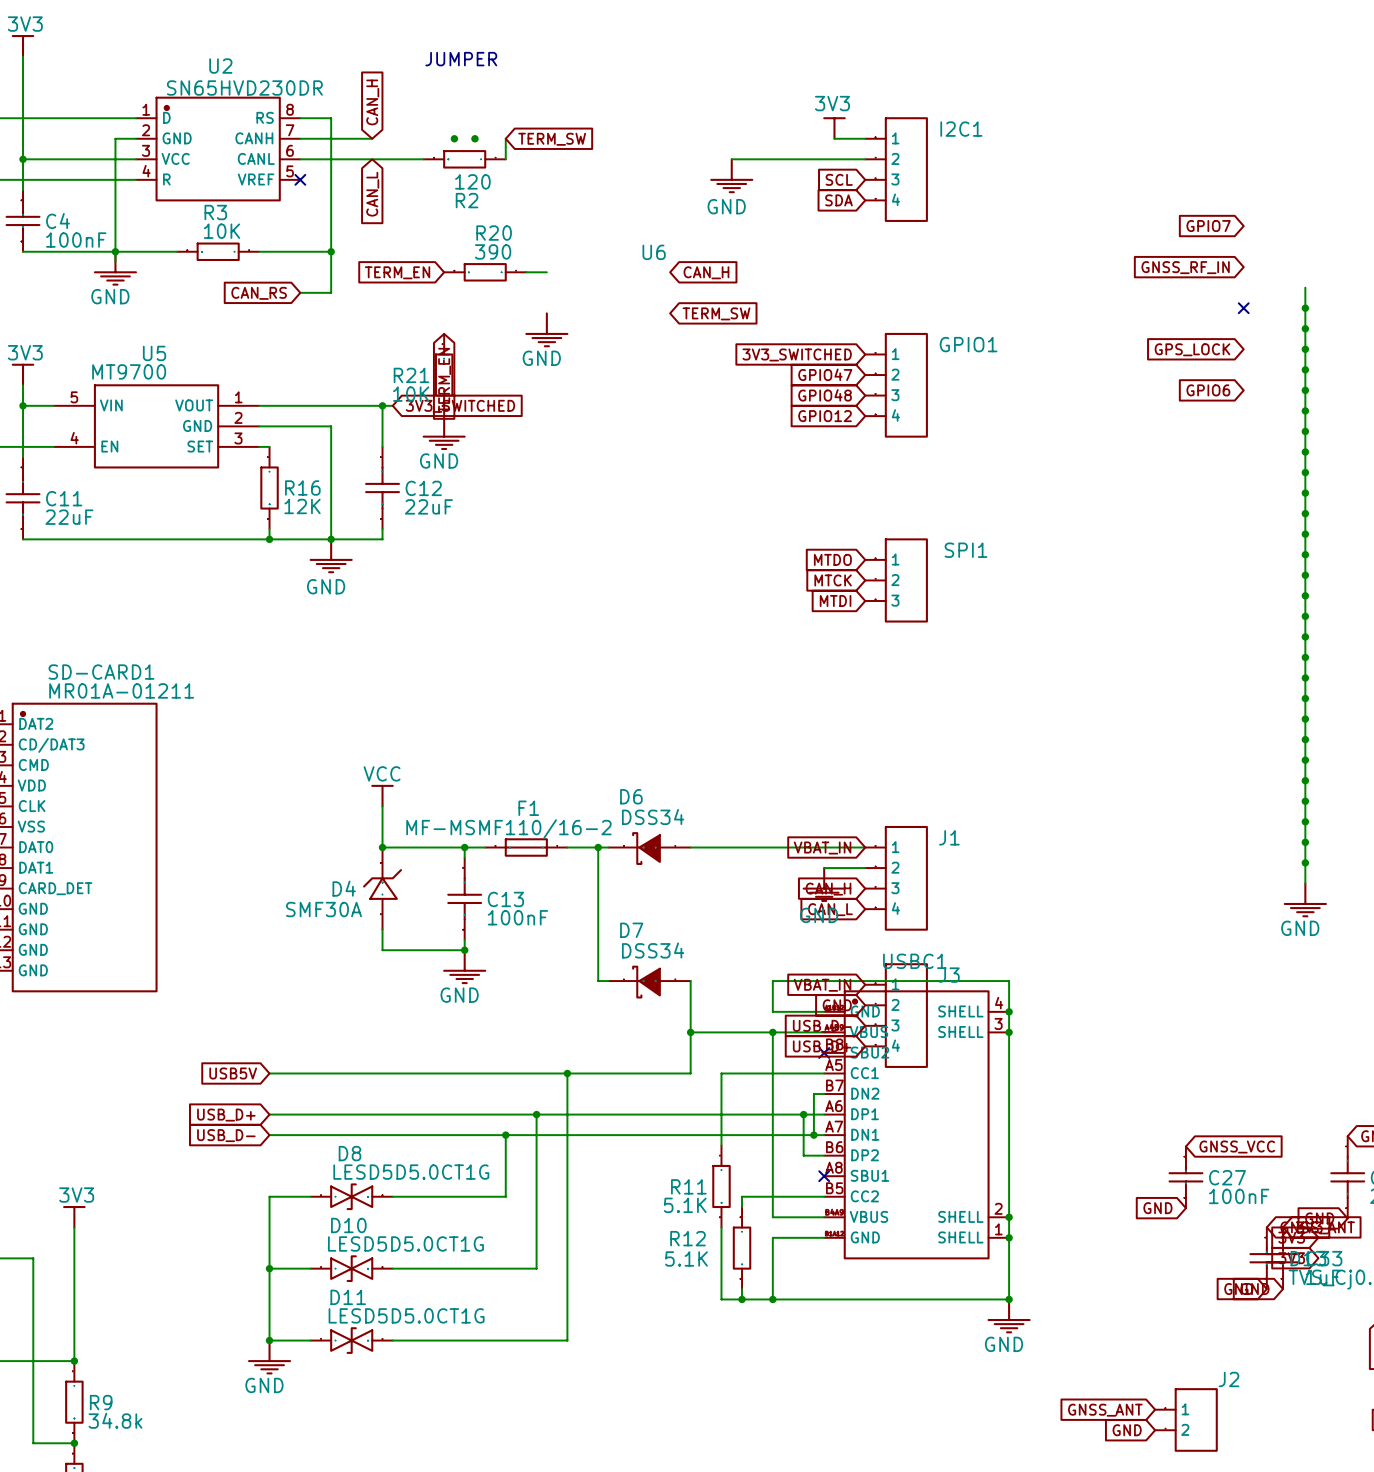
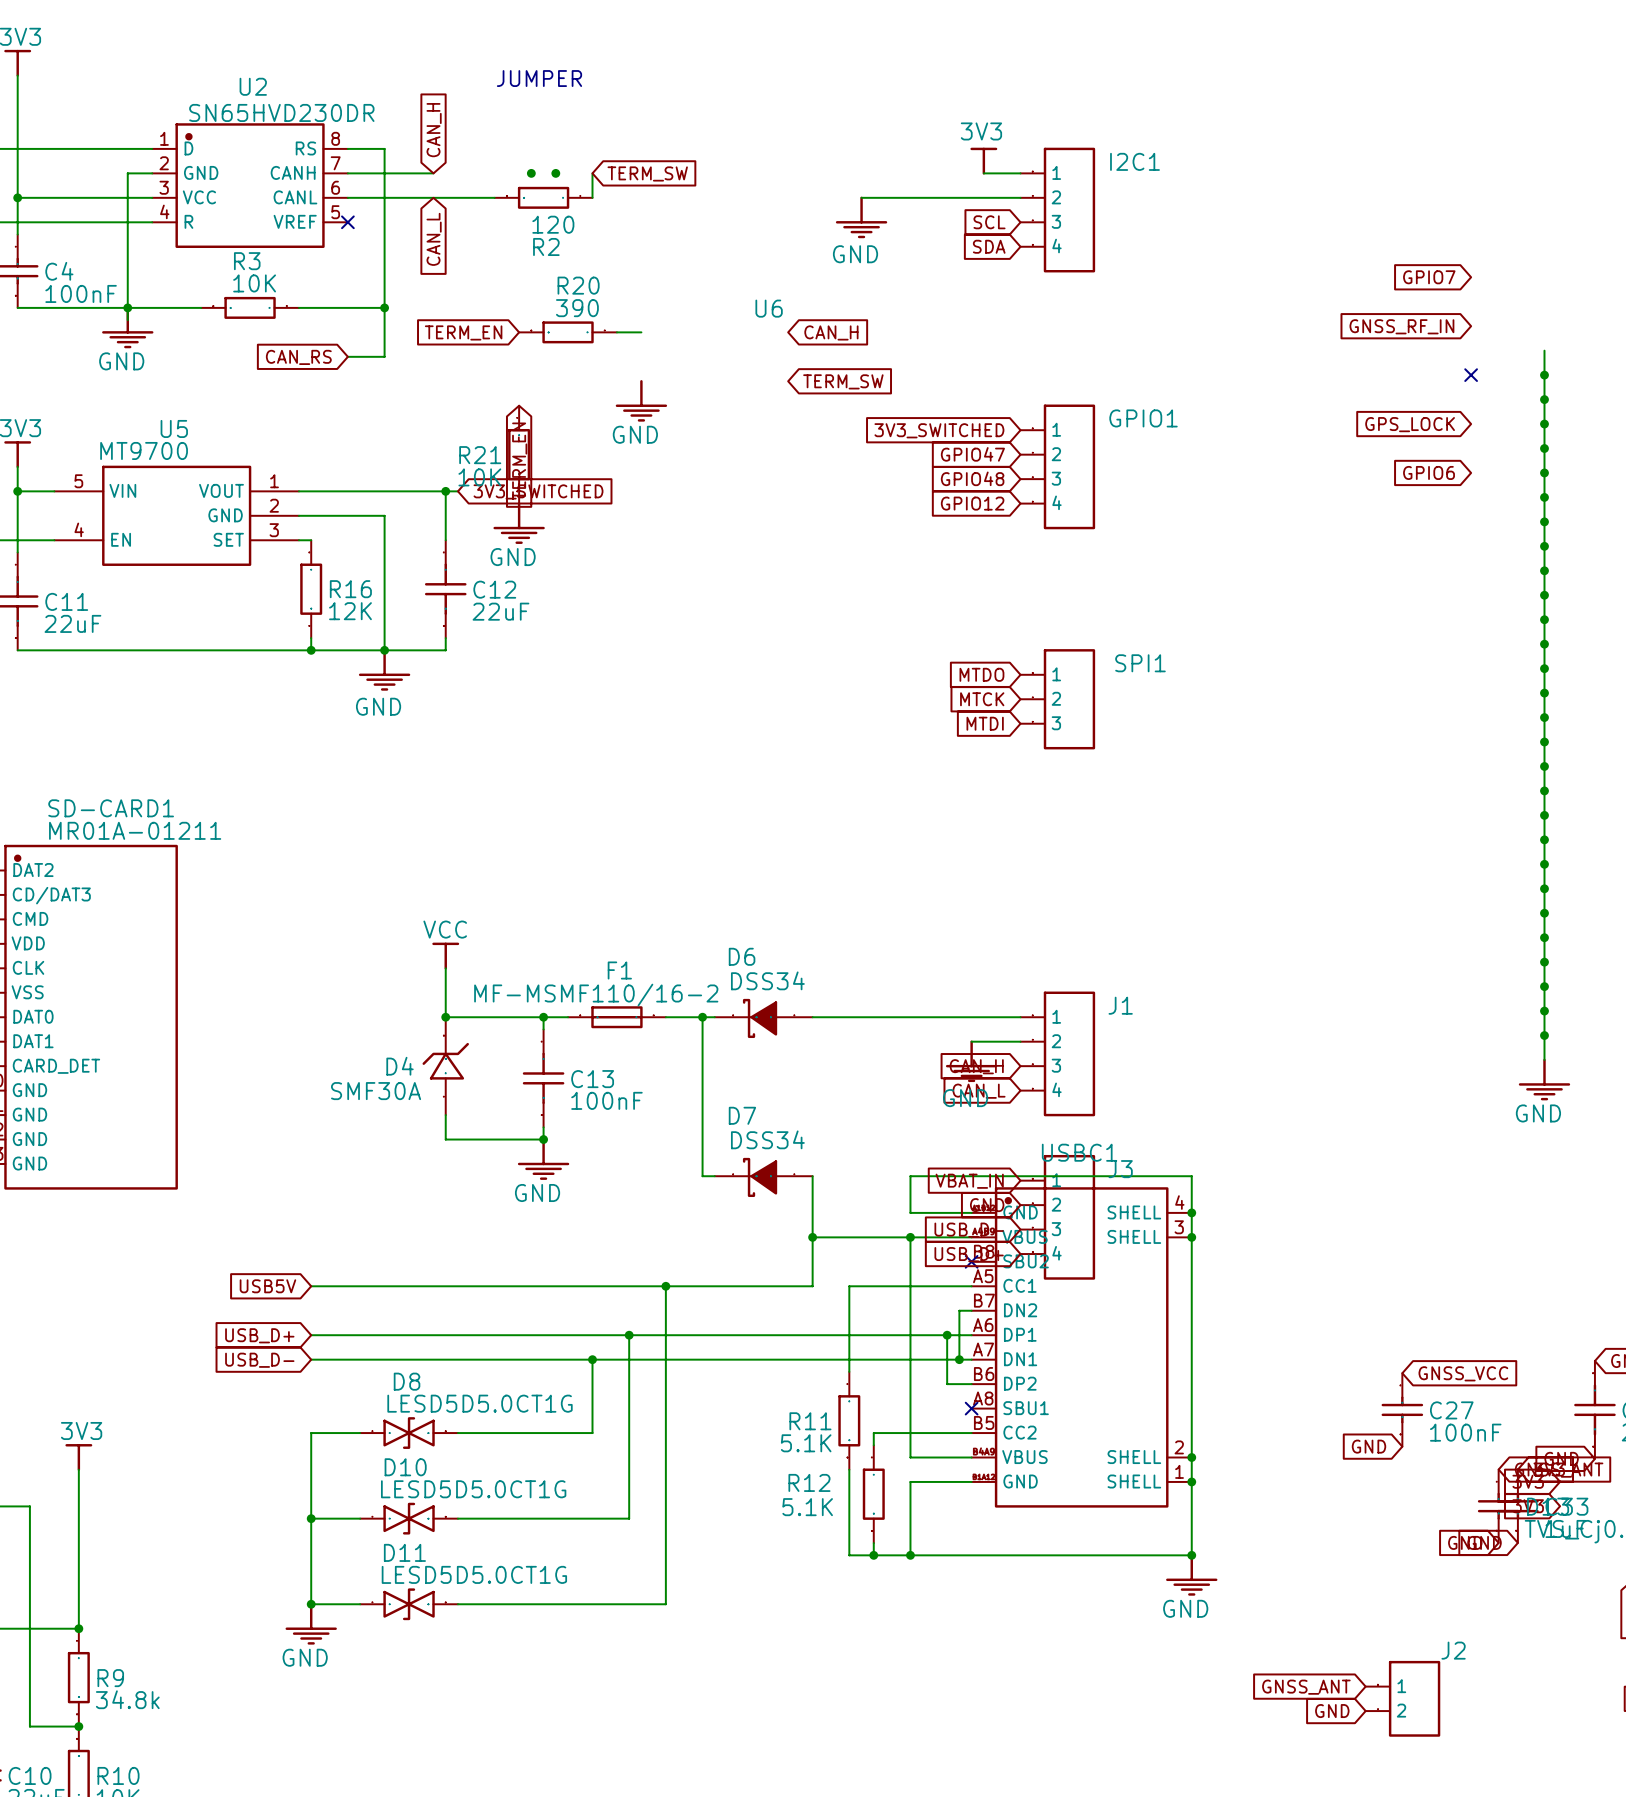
global label: VBAT_IN (822, 848) -> none

